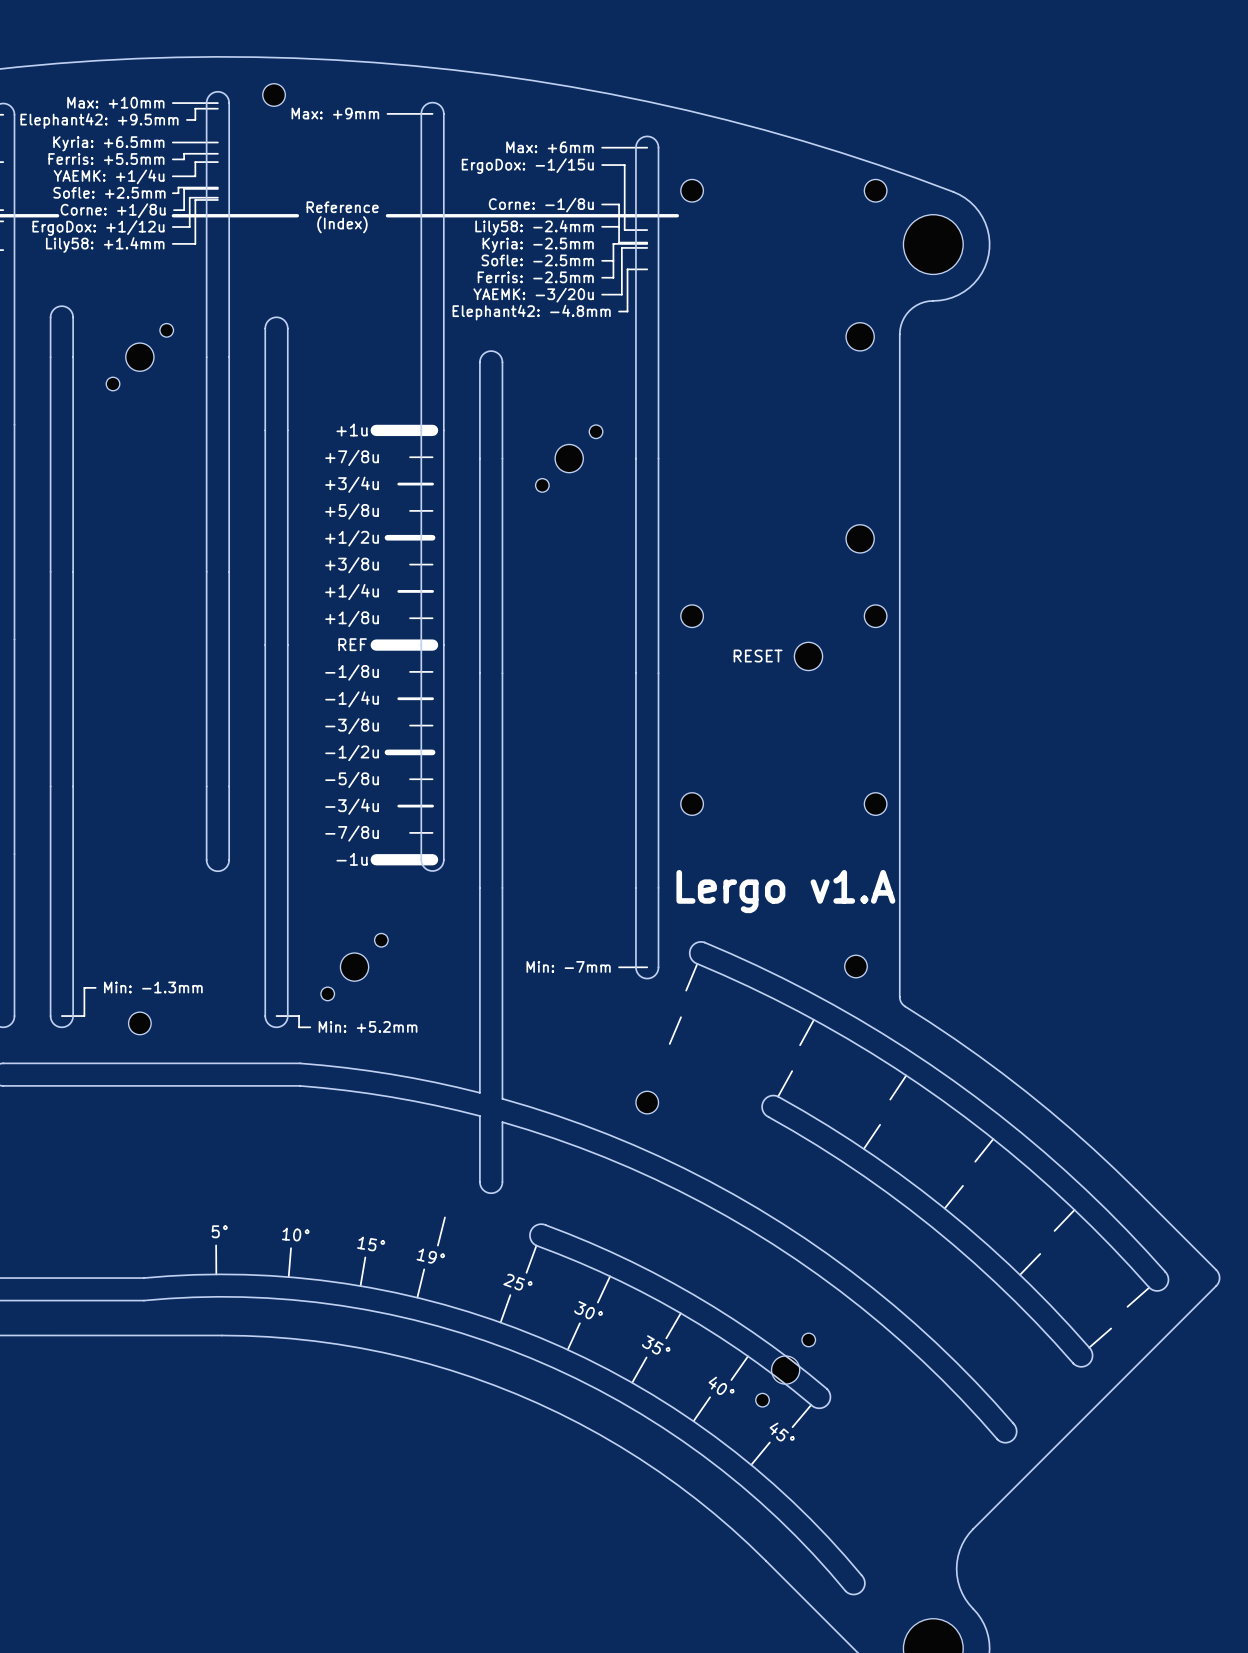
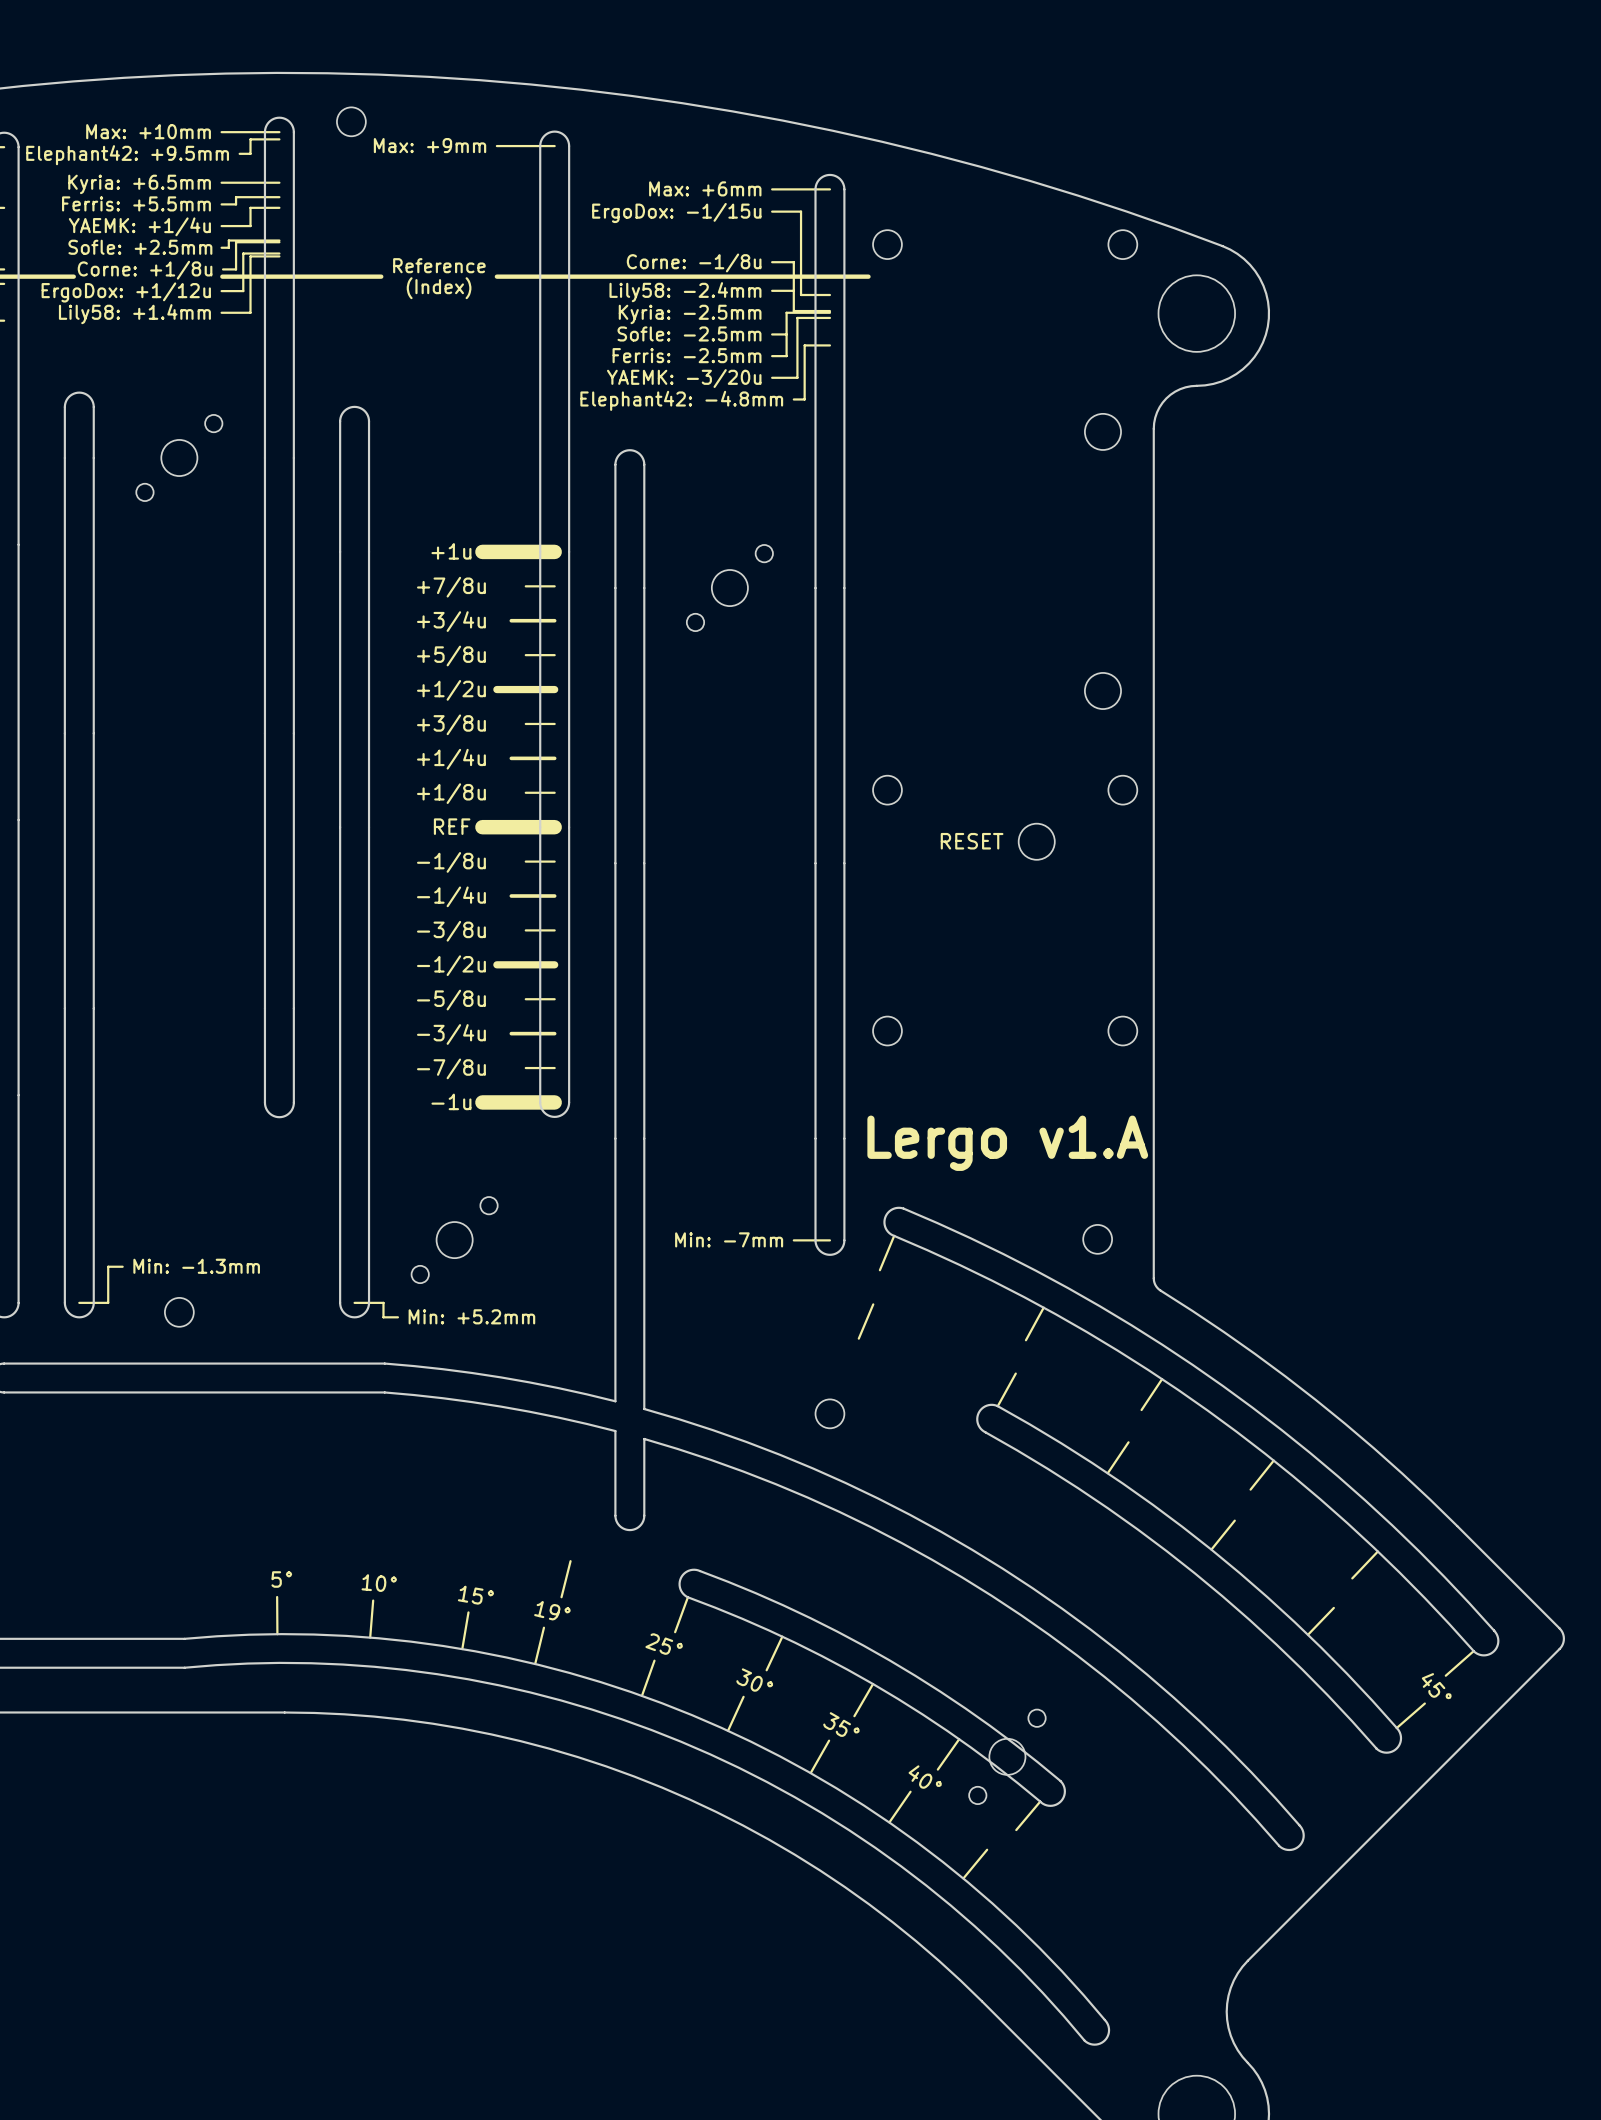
drawing shape: [750, 1286, 1151, 1466] -> [962, 1650, 1475, 1880]

